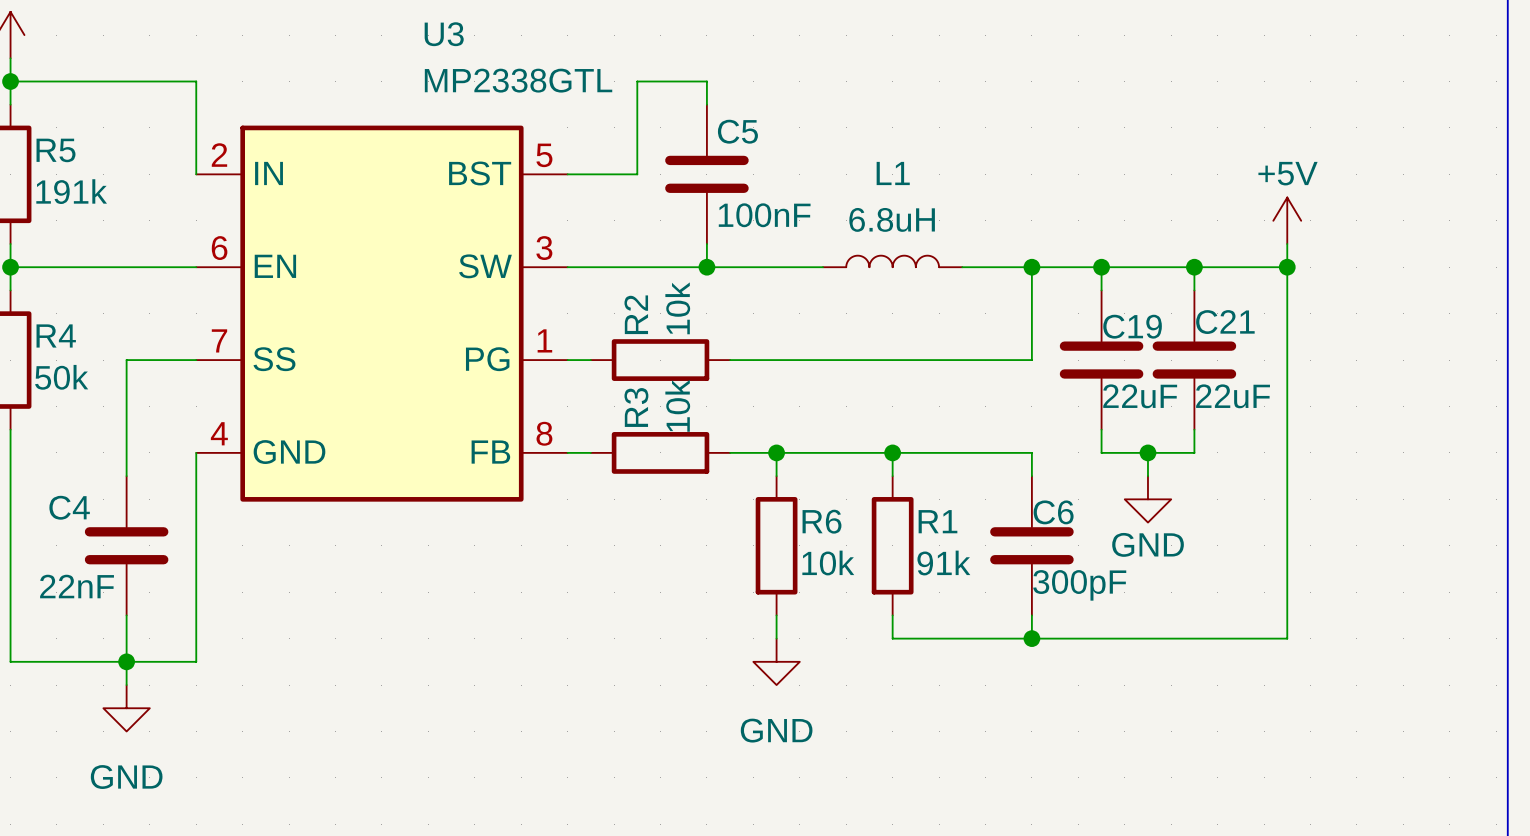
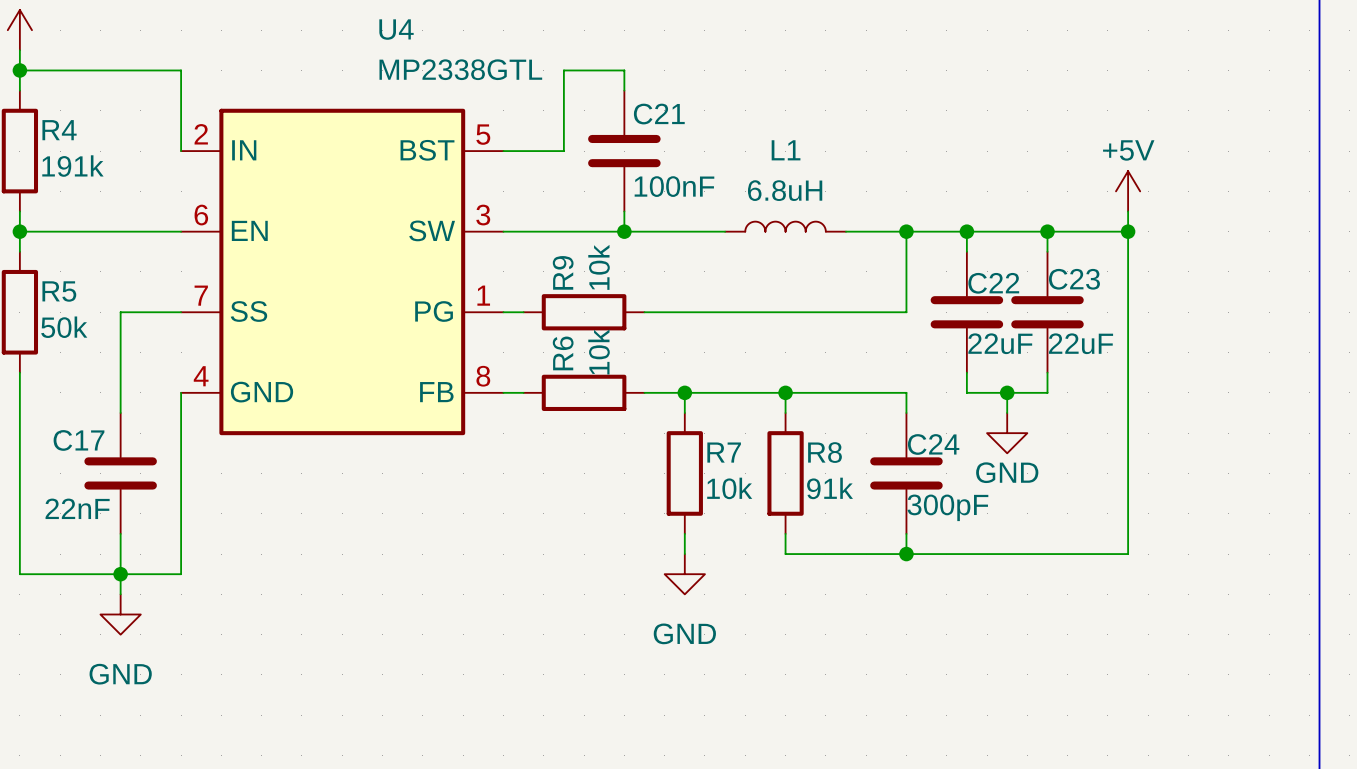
U3 name: U3 (444, 34) -> U4 (396, 29)
C5 name: C5 (737, 131) -> C21 (659, 114)
R5 name: R5 (56, 150) -> R4 (59, 130)
R2 name: R2 (636, 314) -> R9 (563, 272)
C21 name: C21 (1225, 322) -> C23 (1074, 279)
C19 name: C19 (1132, 326) -> C22 (993, 283)
R4 name: R4 (56, 335) -> R5 (59, 291)
R3 name: R3 (636, 407) -> R6 (563, 353)
C4 name: C4 (69, 507) -> C17 (79, 440)
C6 name: C6 (1053, 512) -> C24 (933, 444)
R6 name: R6 (822, 521) -> R7 (724, 452)
R1 name: R1 (937, 521) -> R8 (824, 452)

